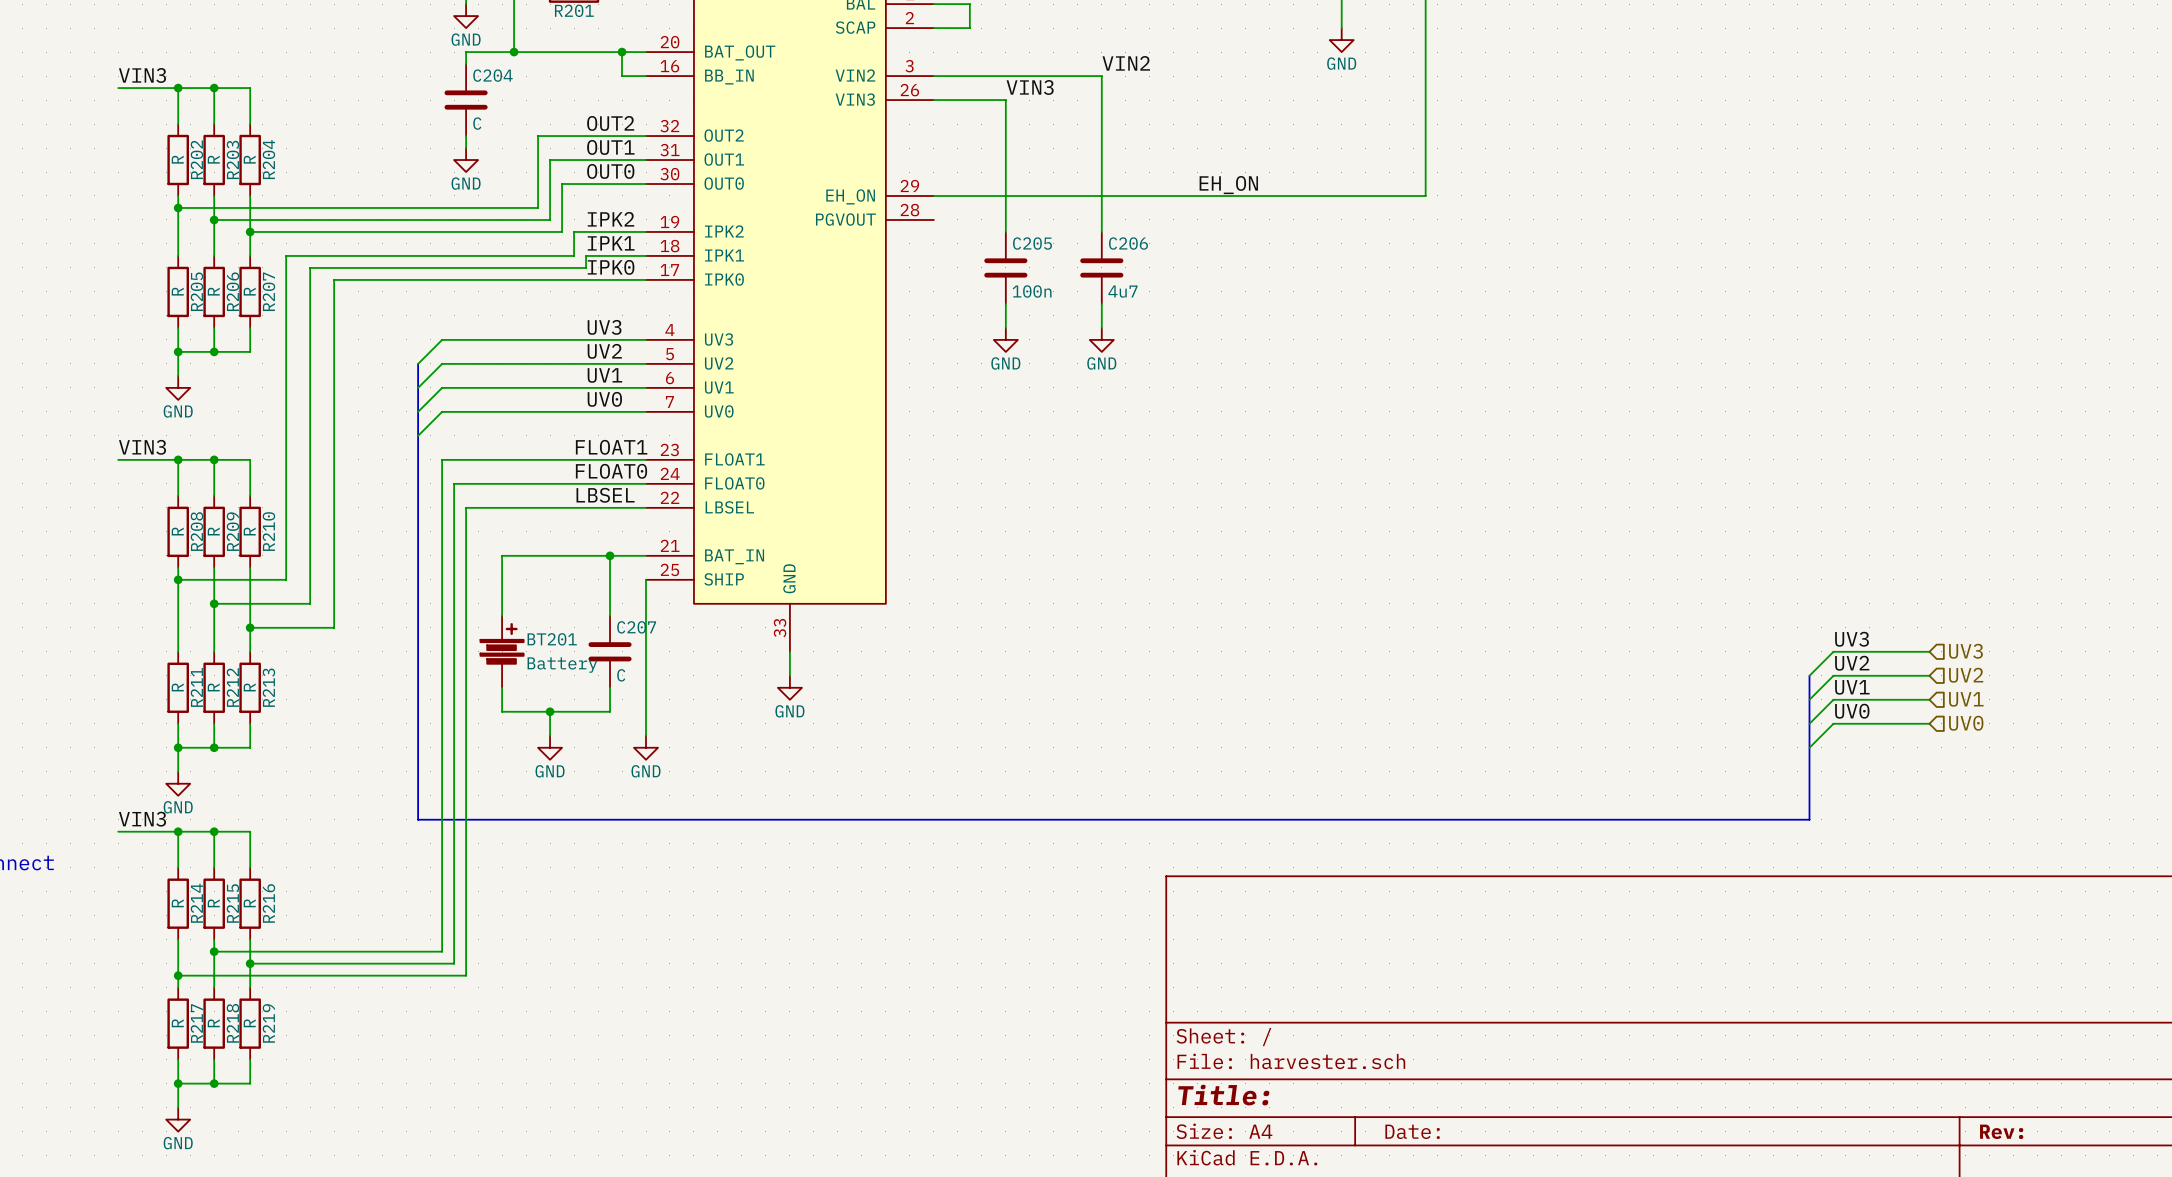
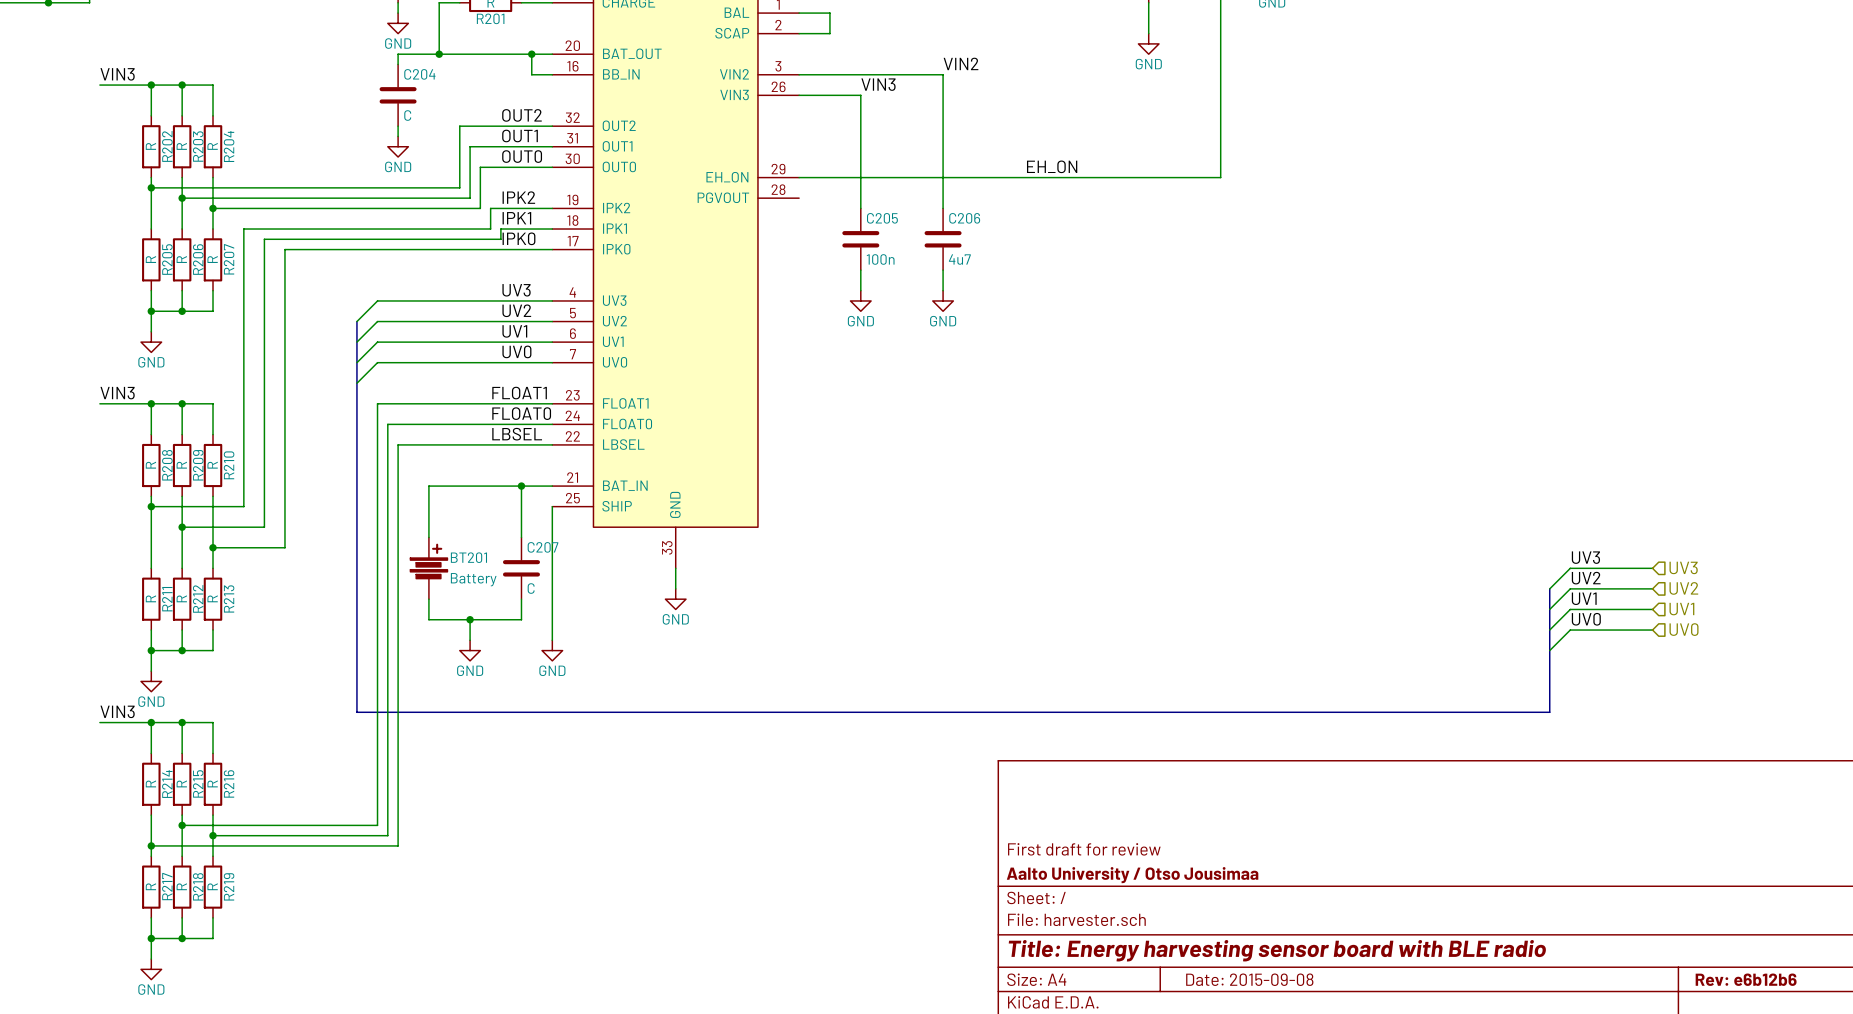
title block: none -> First draft for review (1084, 849)
title block: none -> Aalto University / Otso Jousimaa (1132, 875)
title block: Title: (1223, 1095) -> Title: Energy harvesting sensor board with BLE radio (1277, 950)
title block: Date: (1412, 1131) -> Date: 2015-09-08 (1249, 979)
title block: Rev: (2001, 1131) -> Rev: e6b12b6 (1746, 979)

